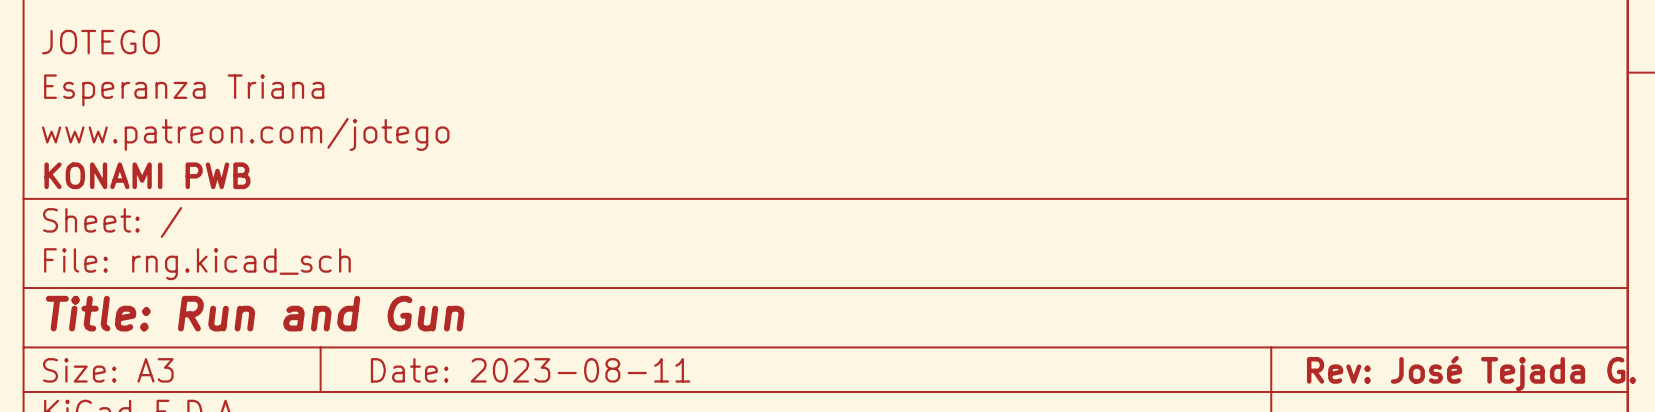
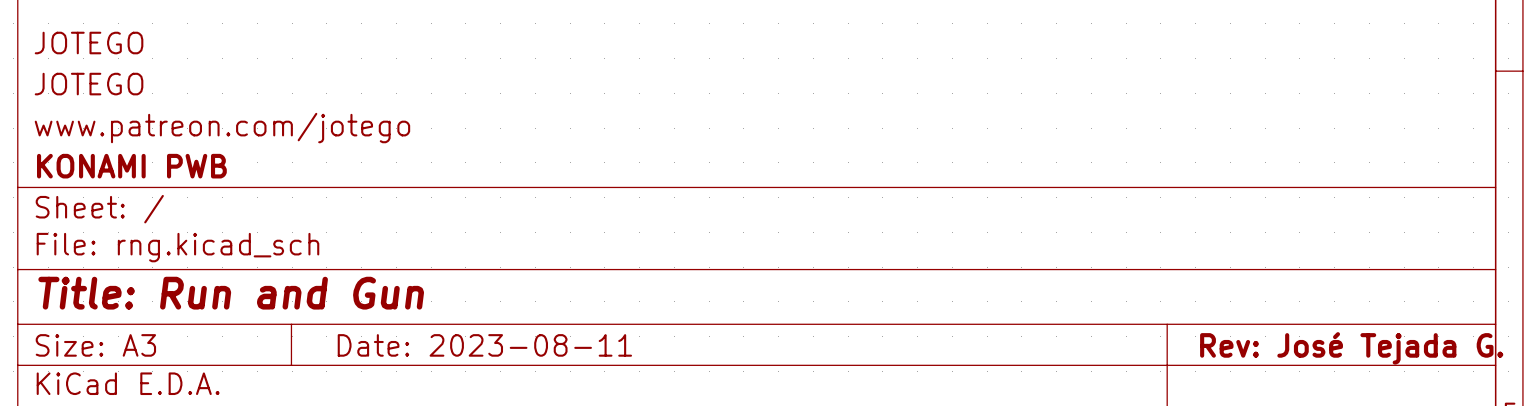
title block: Esperanza Triana (184, 90) -> JOTEGO (89, 84)

